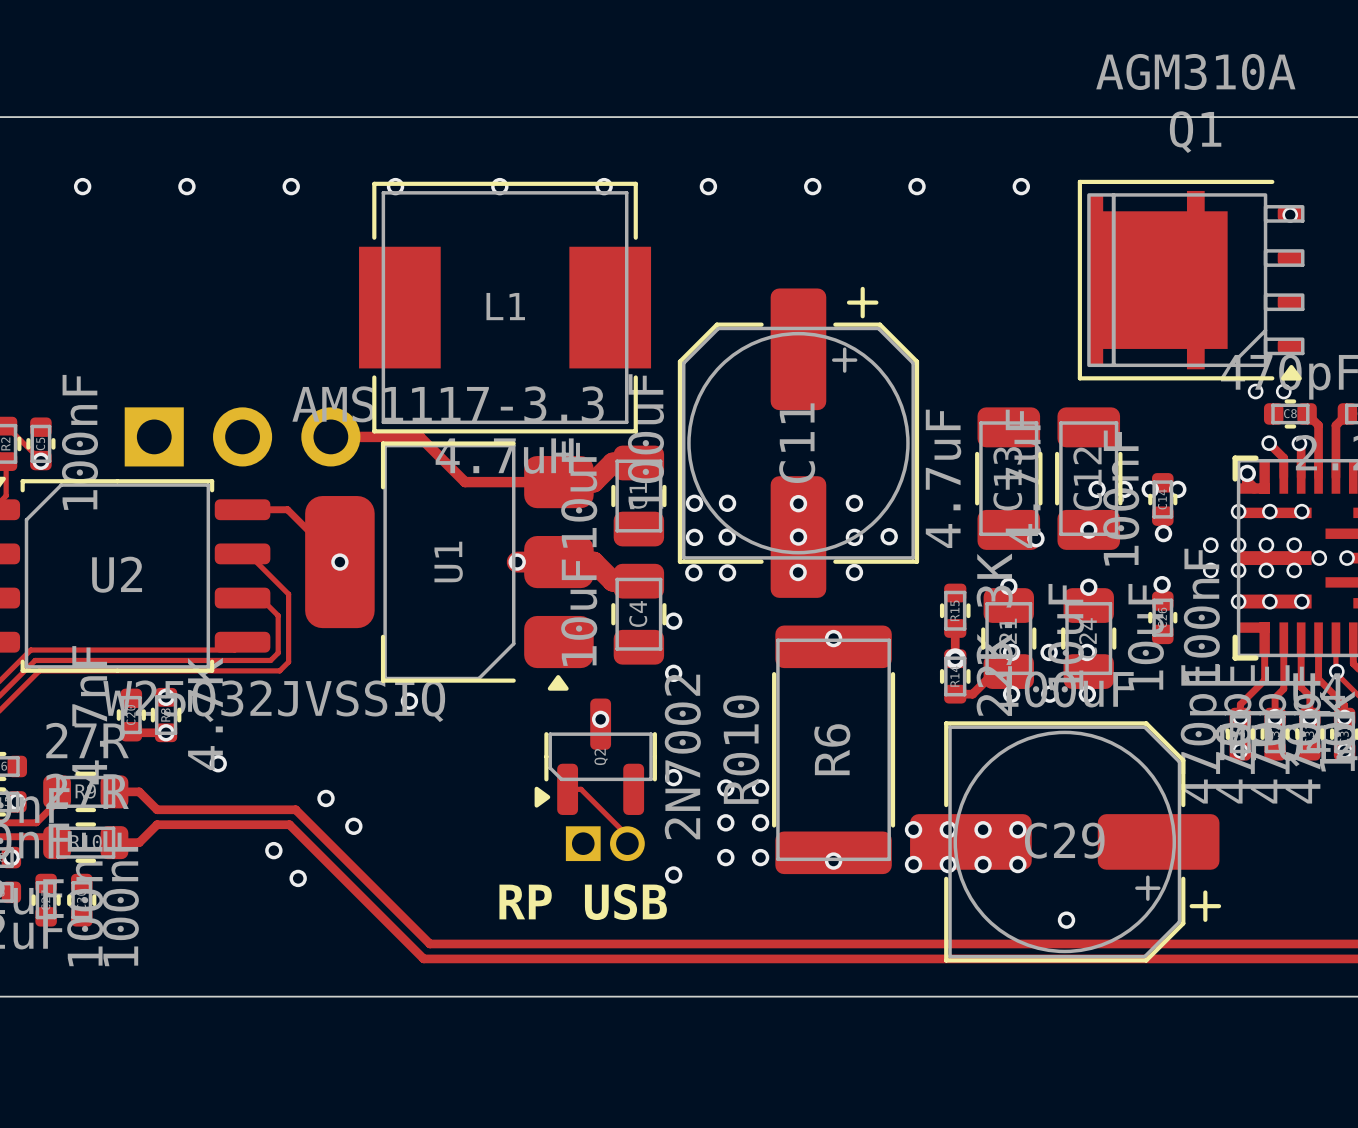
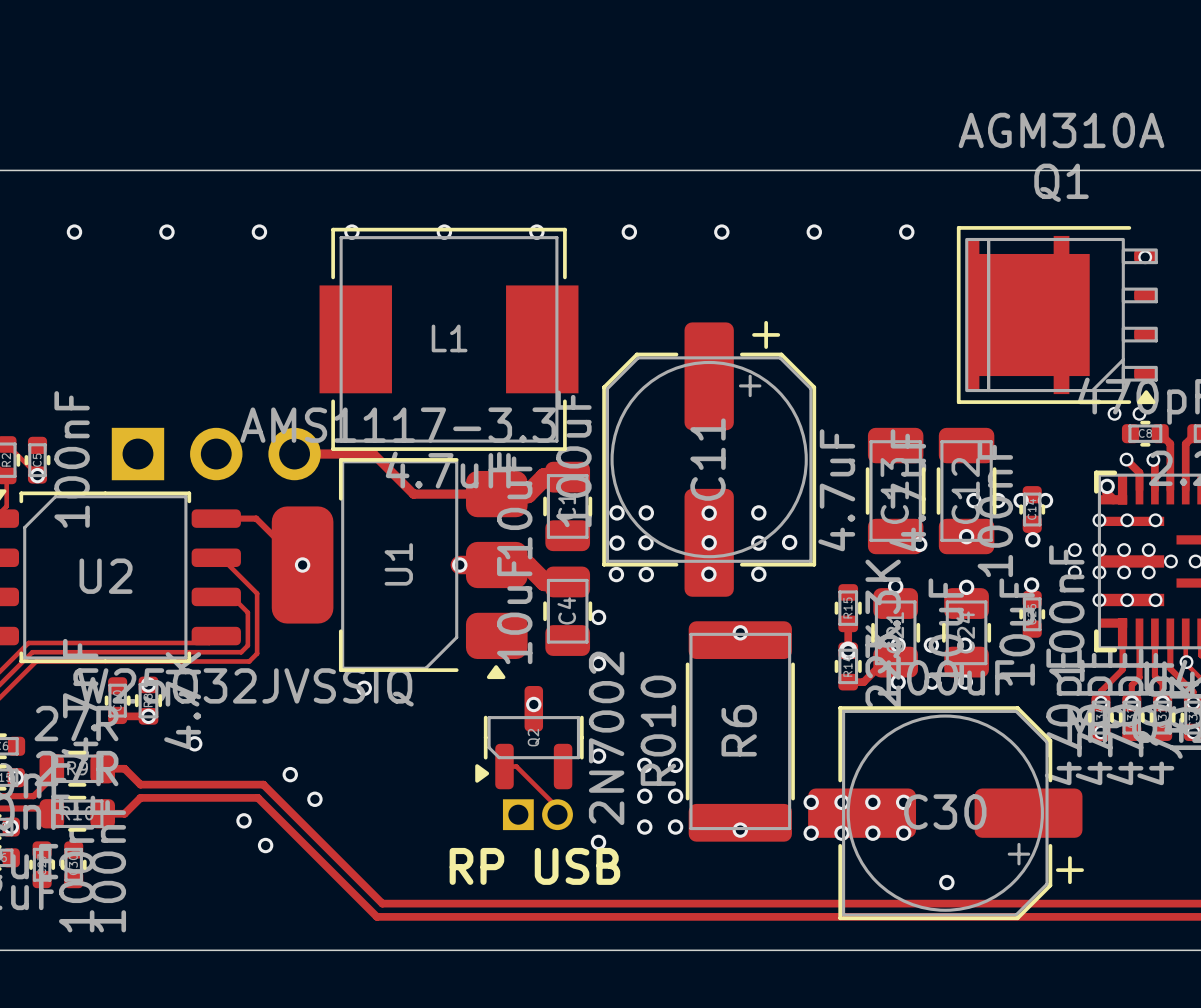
C29 name: C29 (1064, 840) -> C30 (945, 812)

